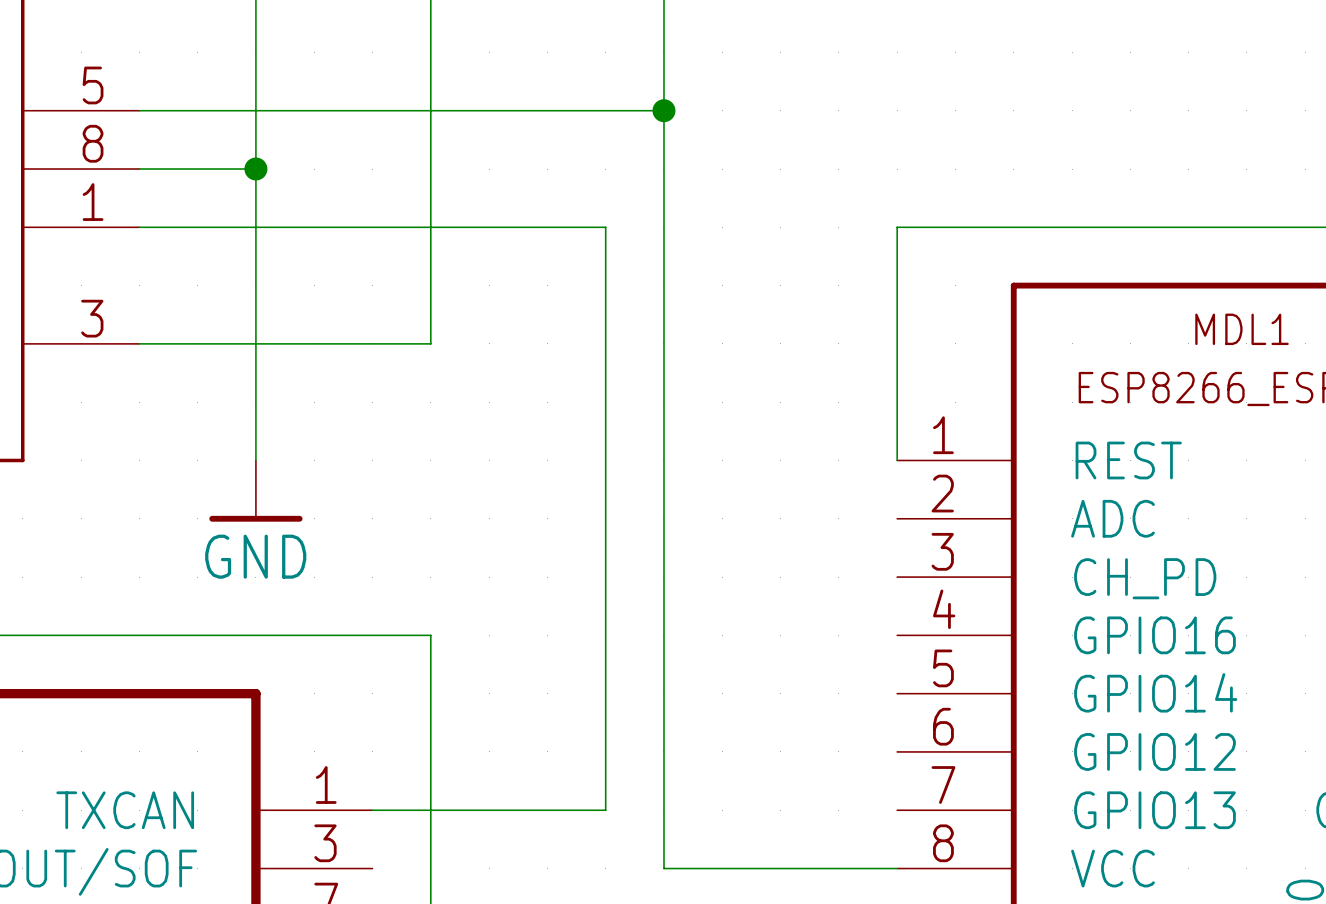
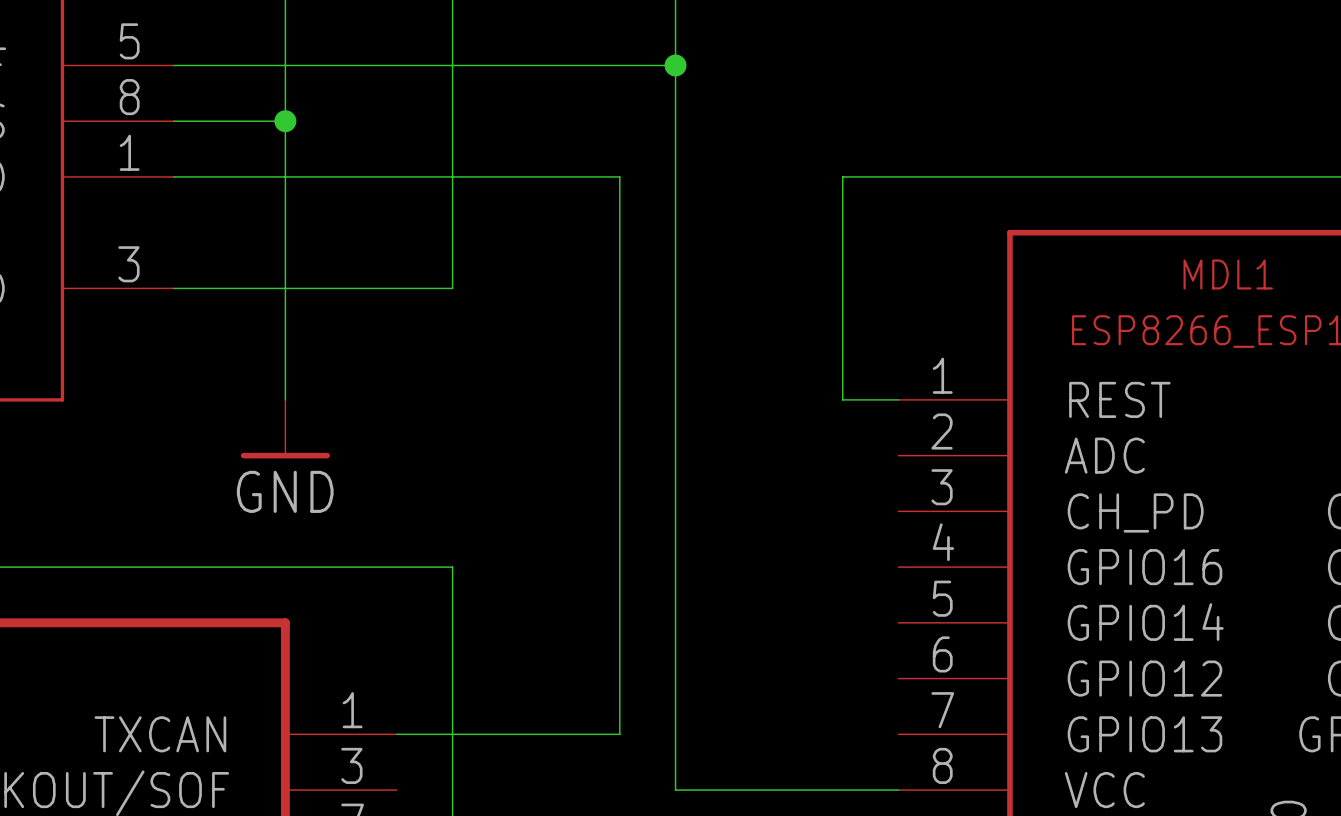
wire: (897, 227) (897, 460) -> (898, 176) (842, 176) (842, 399) (898, 399)

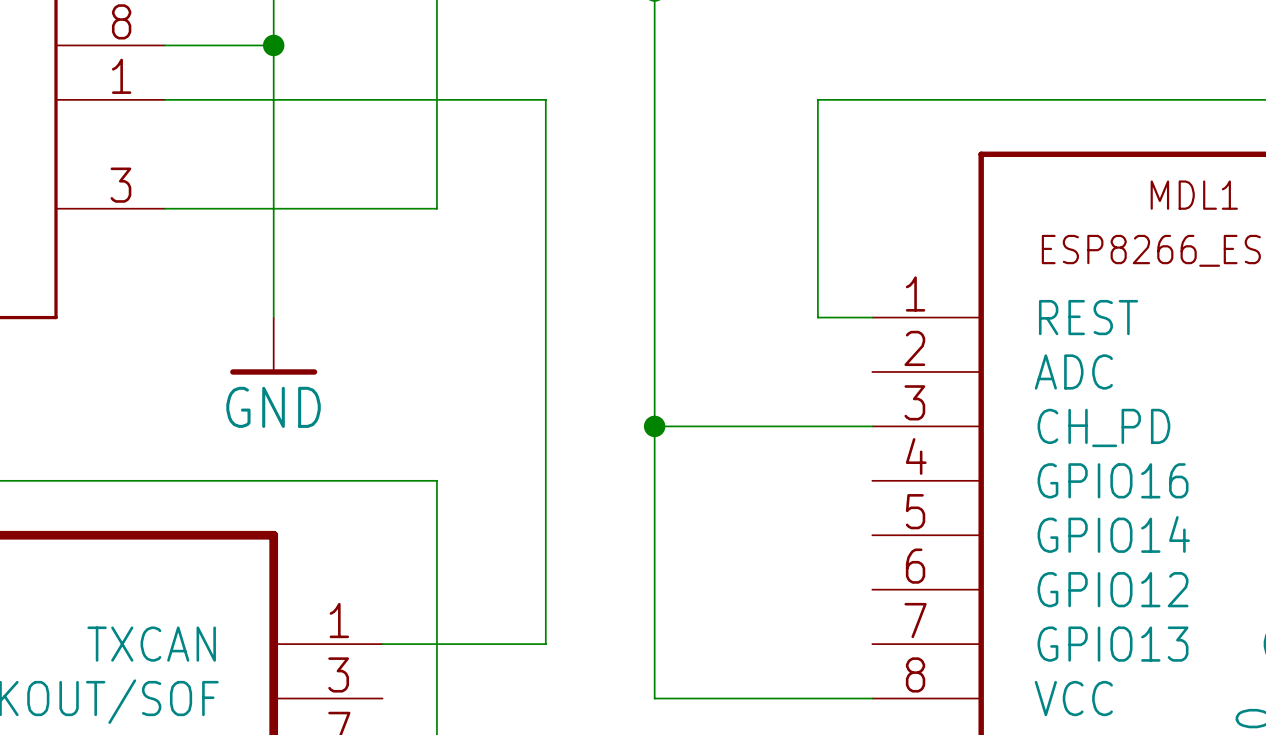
wire: (564, 176) (619, 176) (619, 734) (564, 734) -> (545, 99) (545, 644)
wire: none -> (654, 426) (872, 426)
junction: none -> (654, 426)

